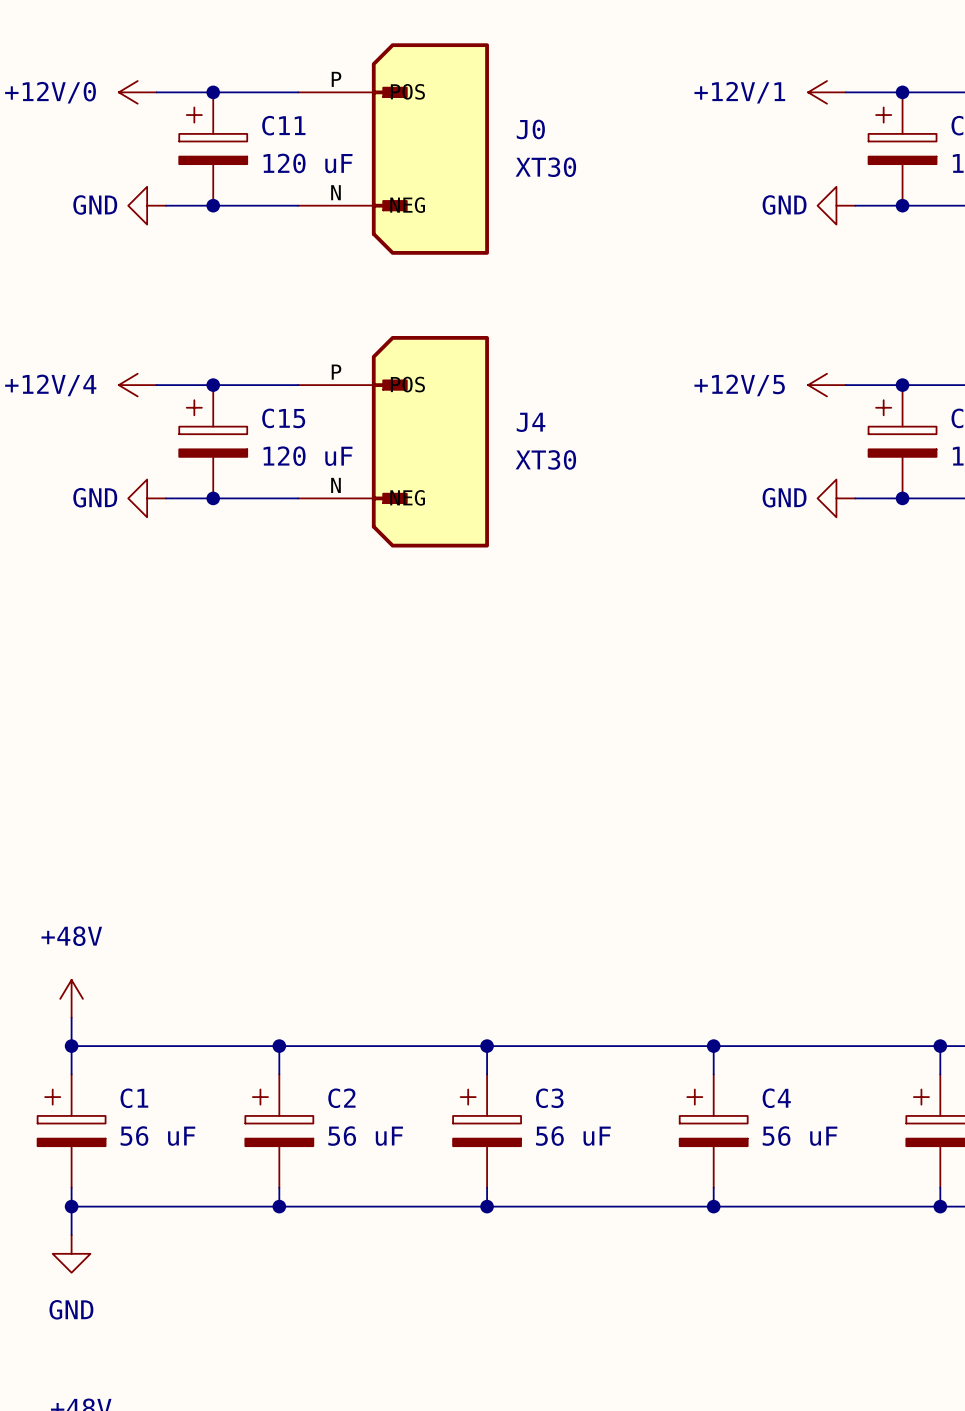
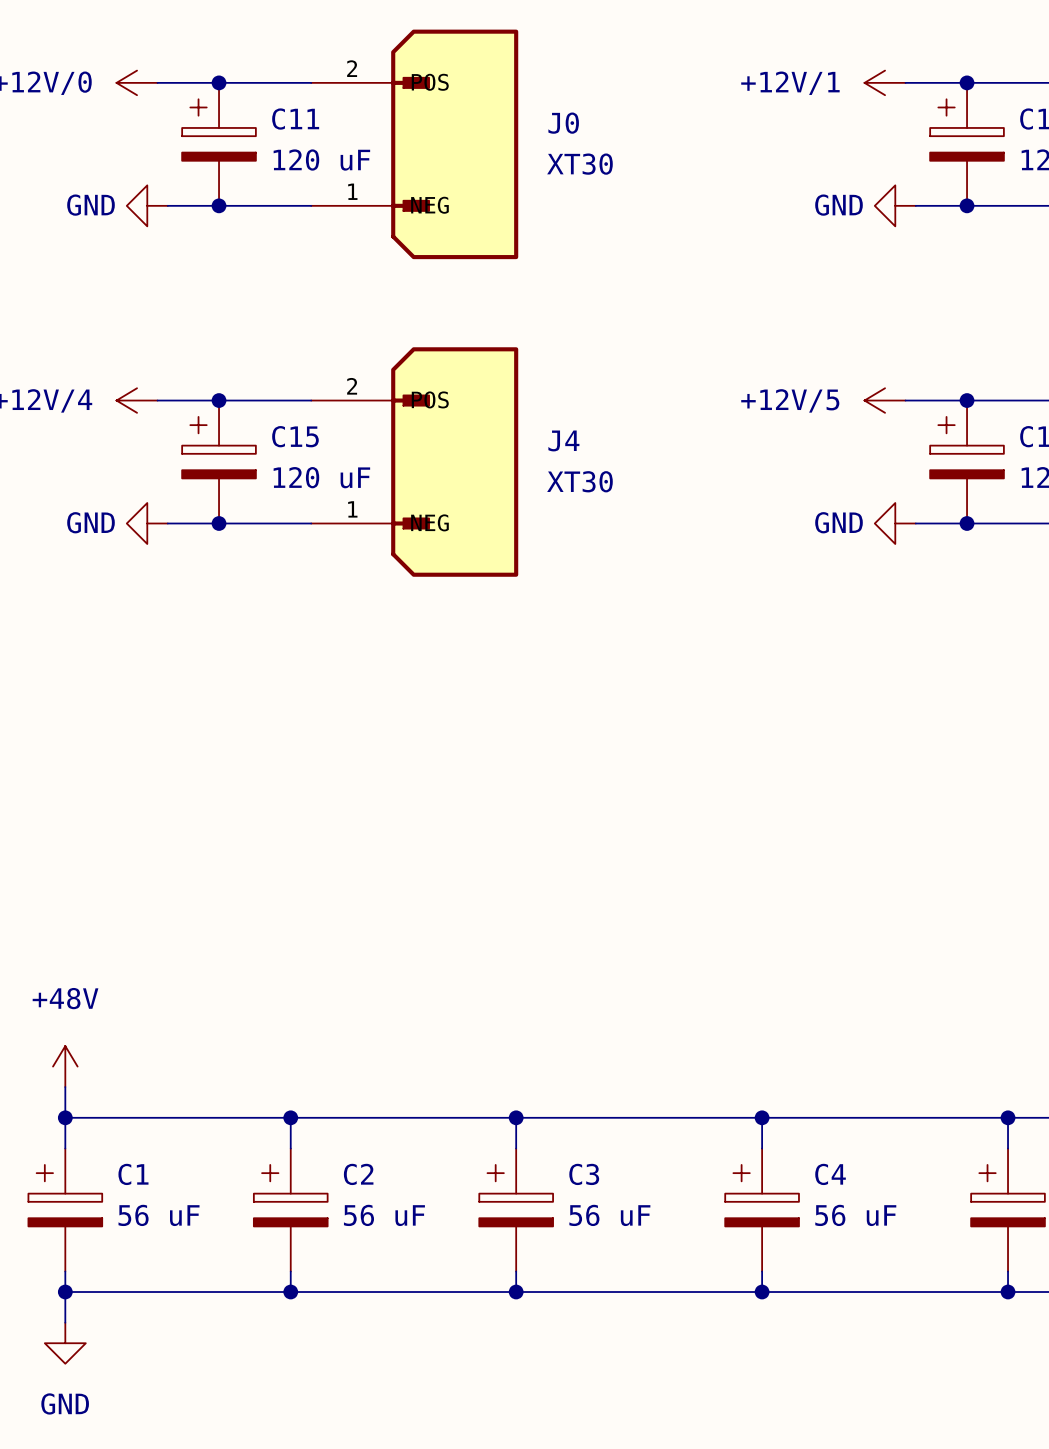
J0 pin number: P (336, 79) -> 2 (352, 68)
J0 pin number: N (335, 192) -> 1 (352, 191)
J4 pin number: P (336, 372) -> 2 (352, 386)
J4 pin number: N (335, 485) -> 1 (352, 509)

